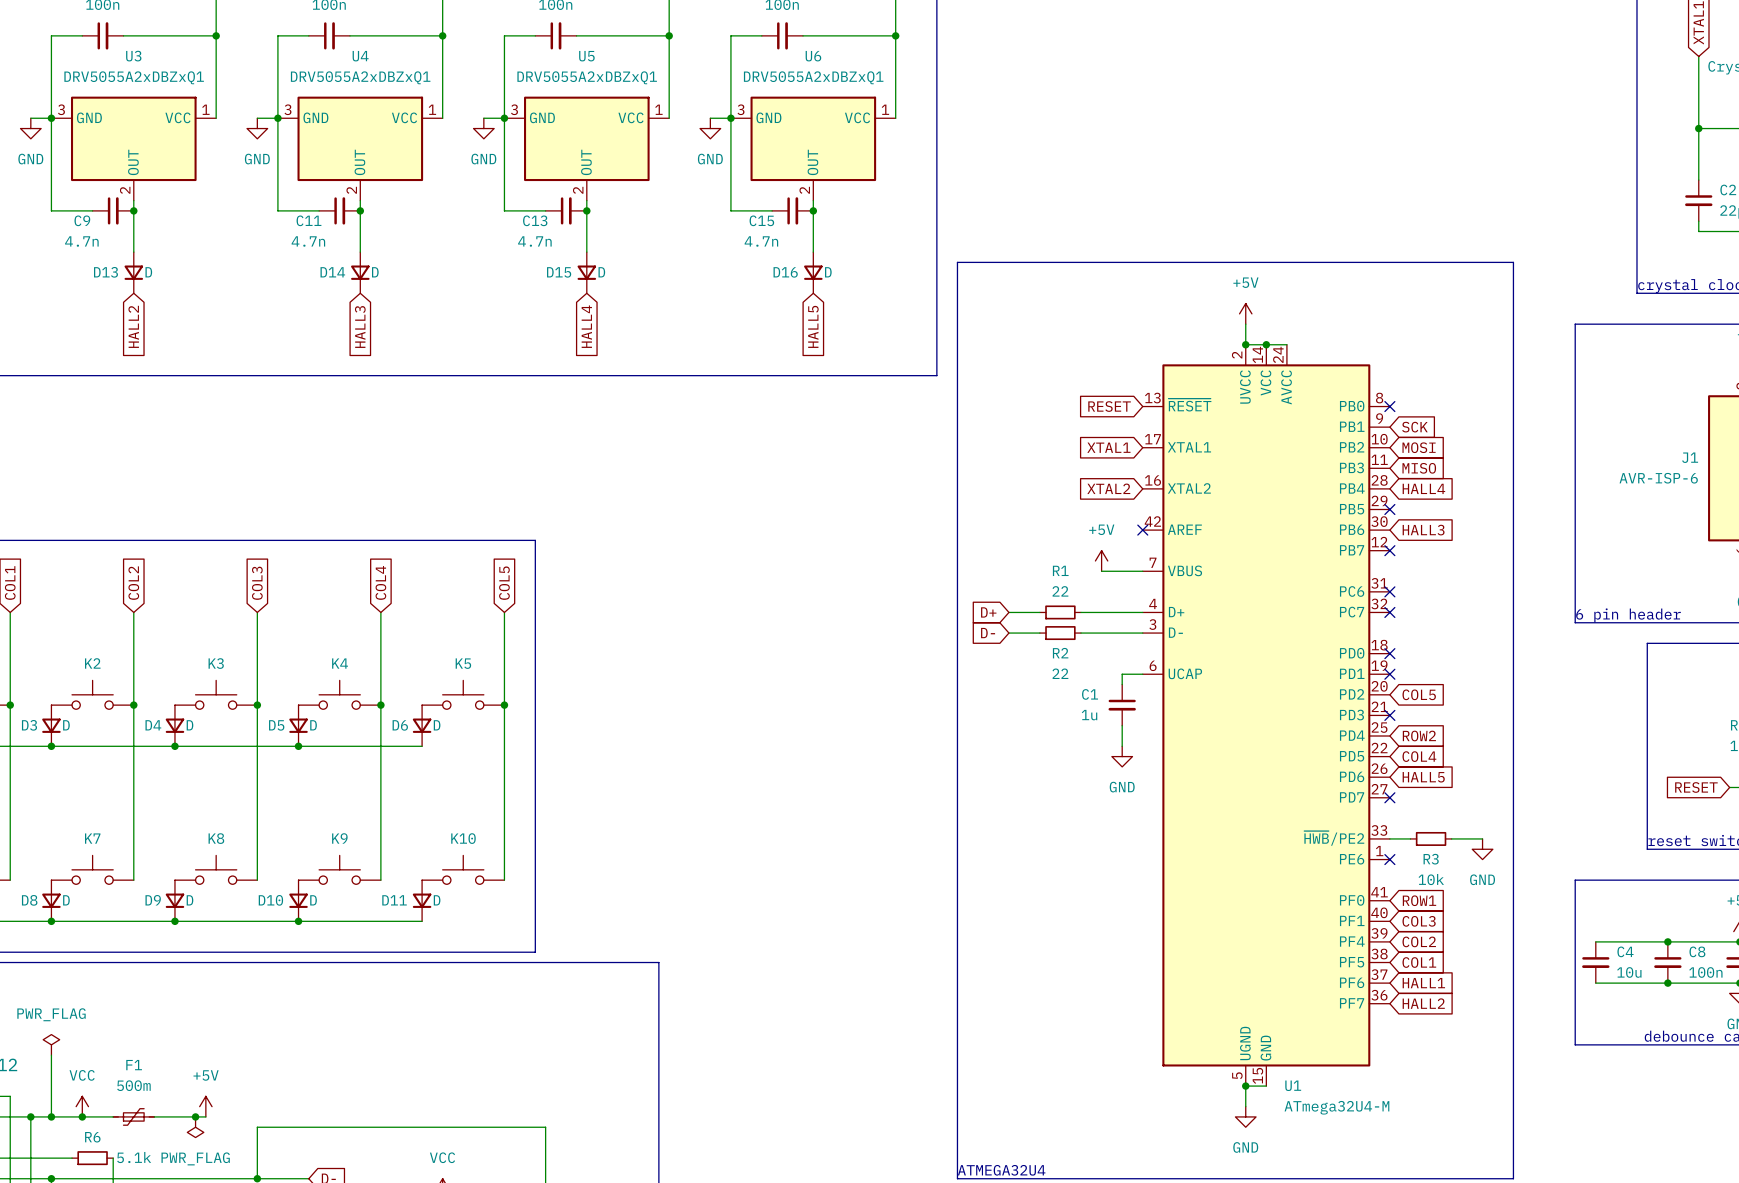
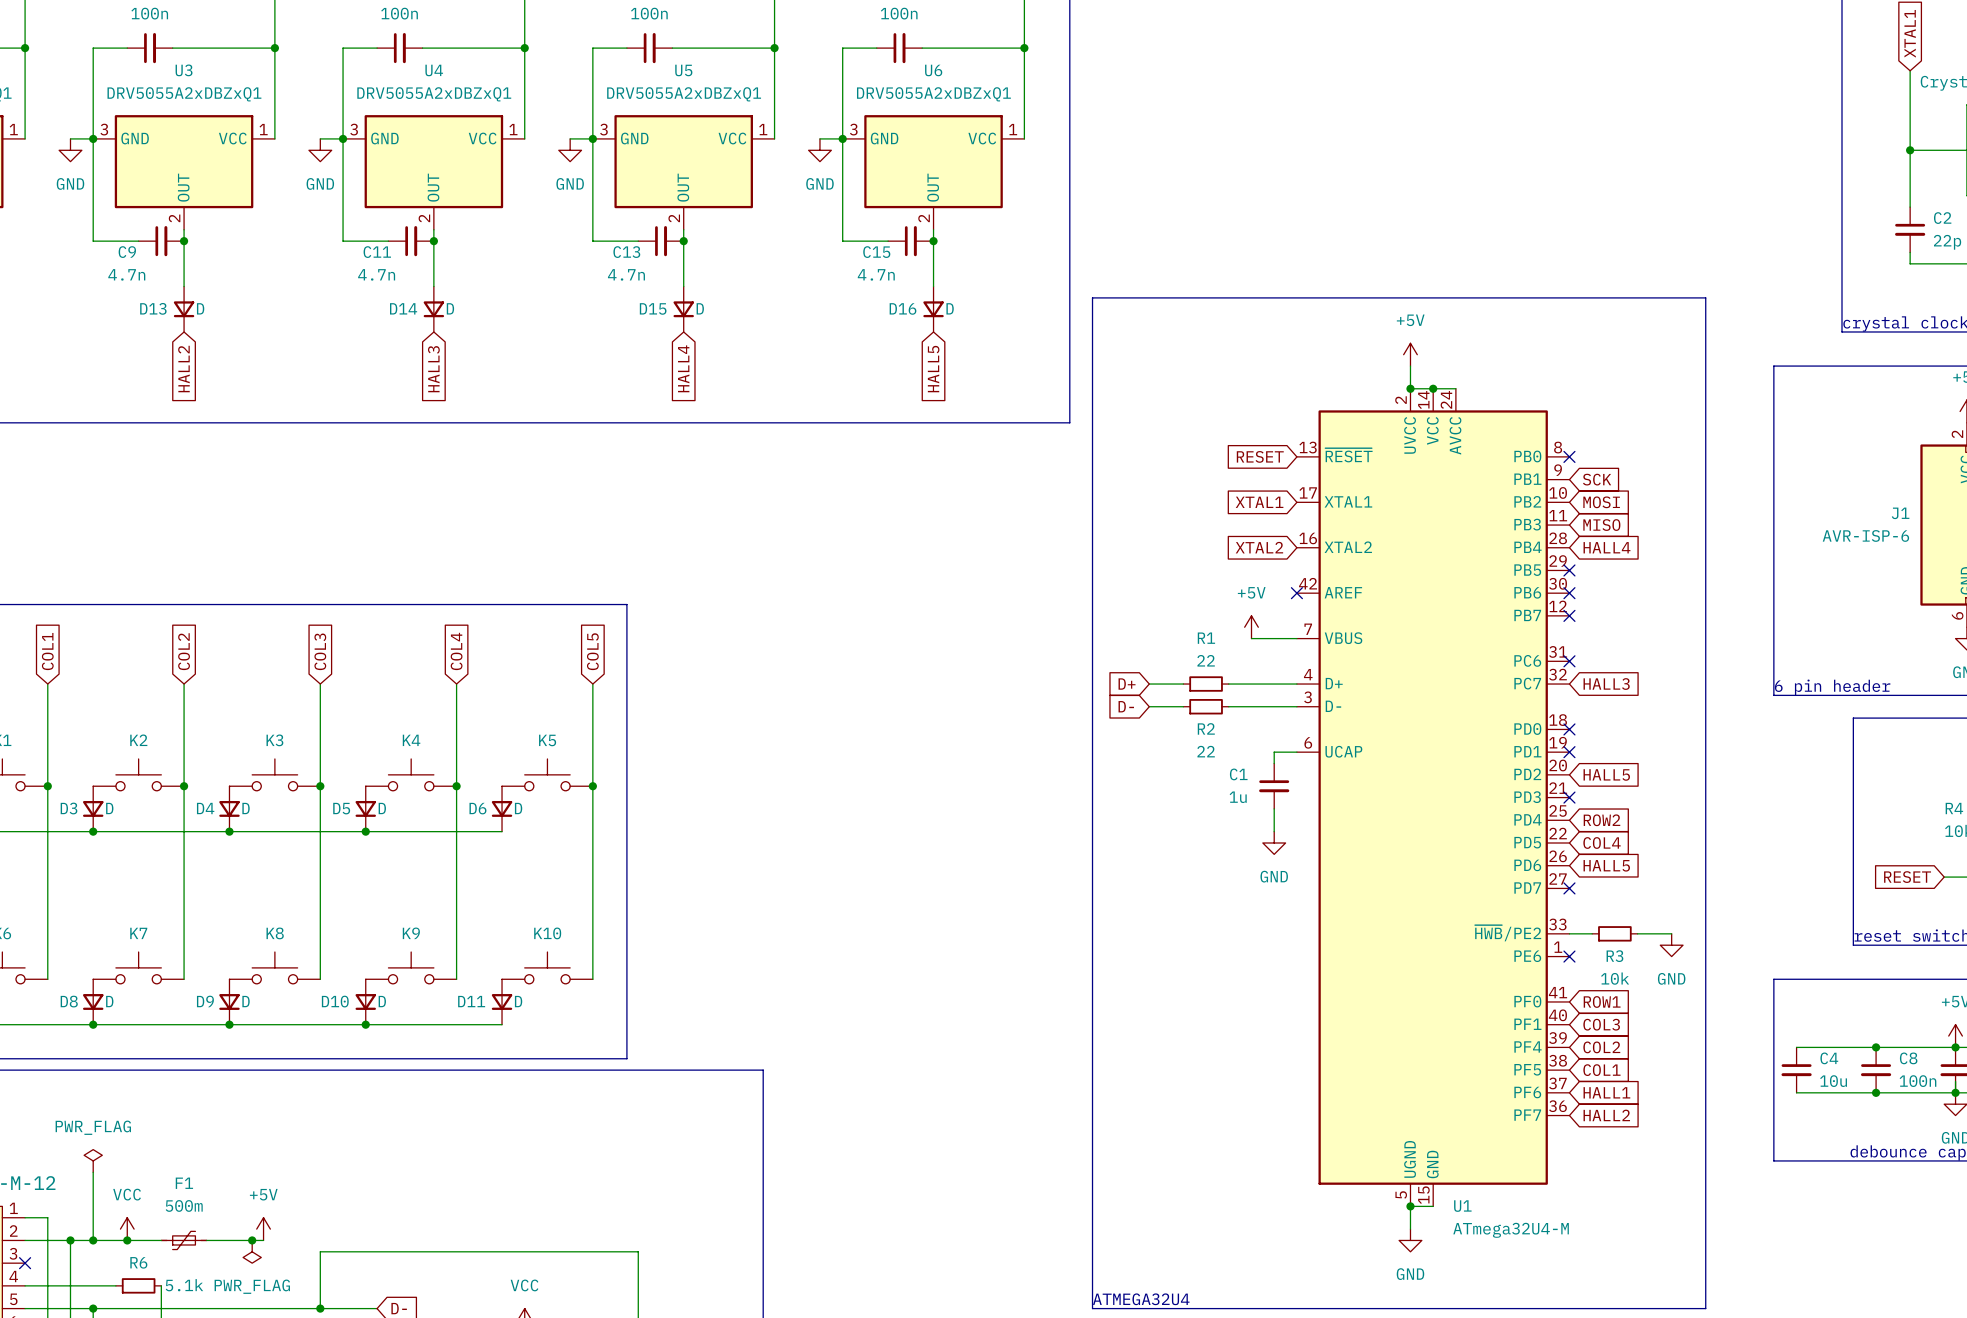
no-connect mark: none -> (1569, 593)
global label position: HALL3 (1423, 530) -> HALL3 (1606, 684)
no-connect mark: (1389, 612) -> none
global label: COL5 (1419, 694) -> HALL5 (1606, 774)

